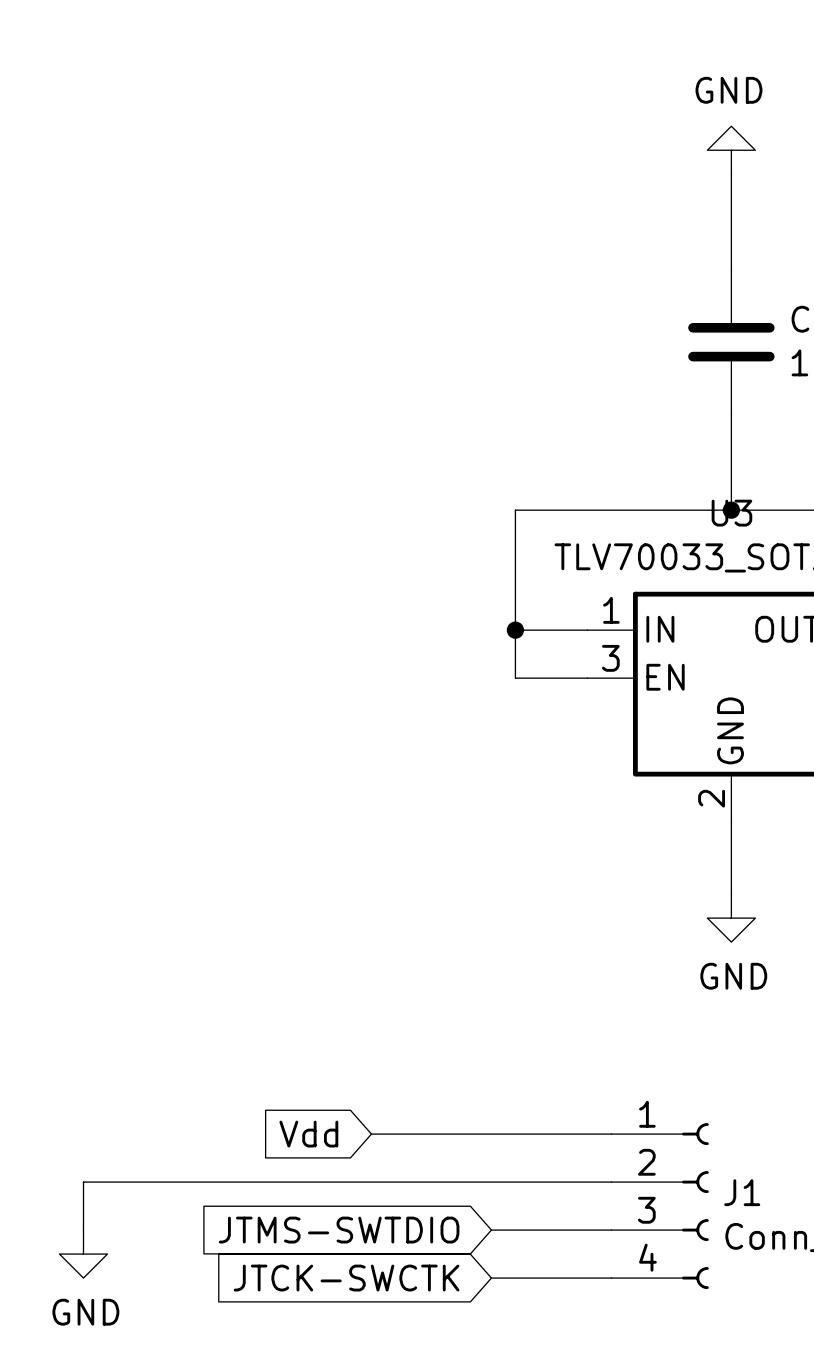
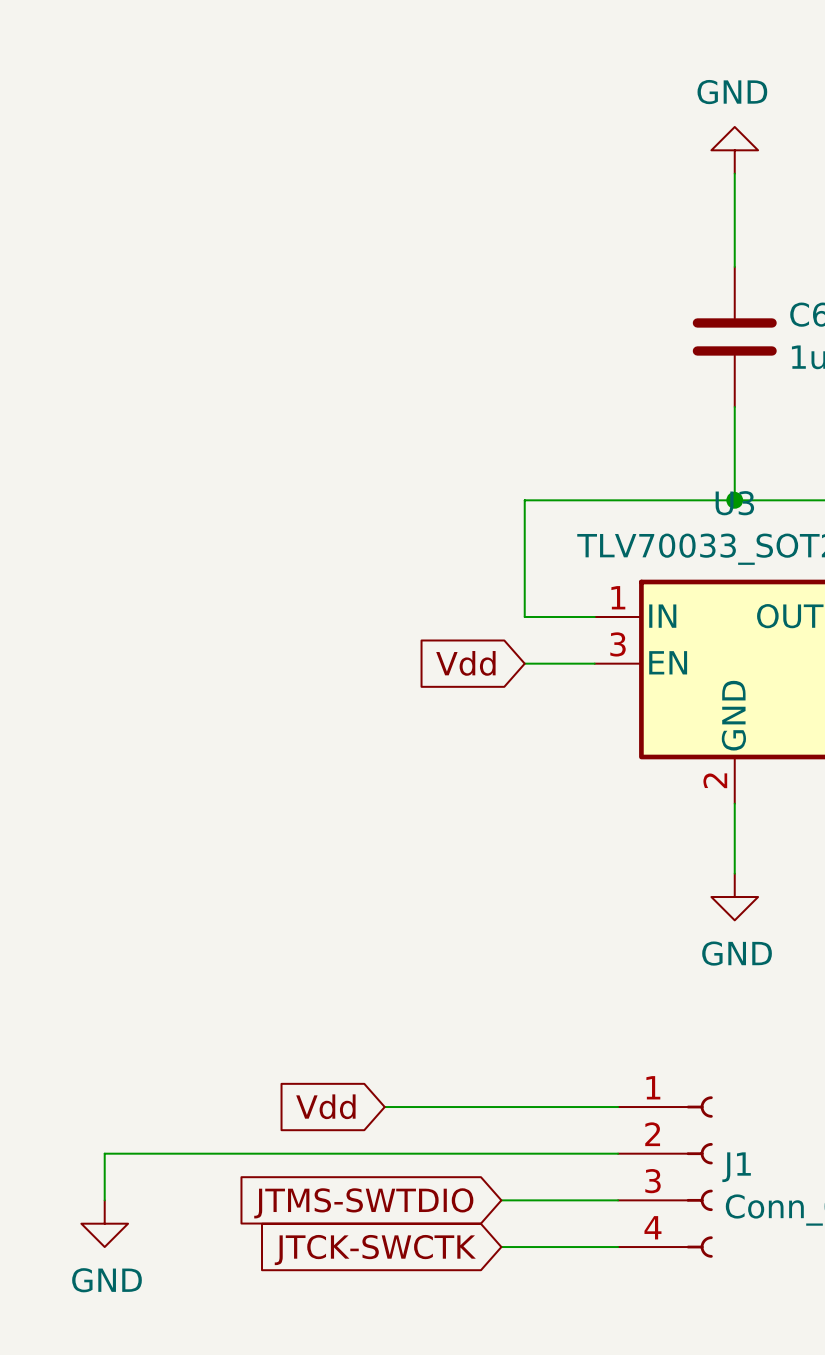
wire: (515, 630) (515, 678) -> none
junction: (515, 630) -> none
global label: none -> Vdd (465, 663)

